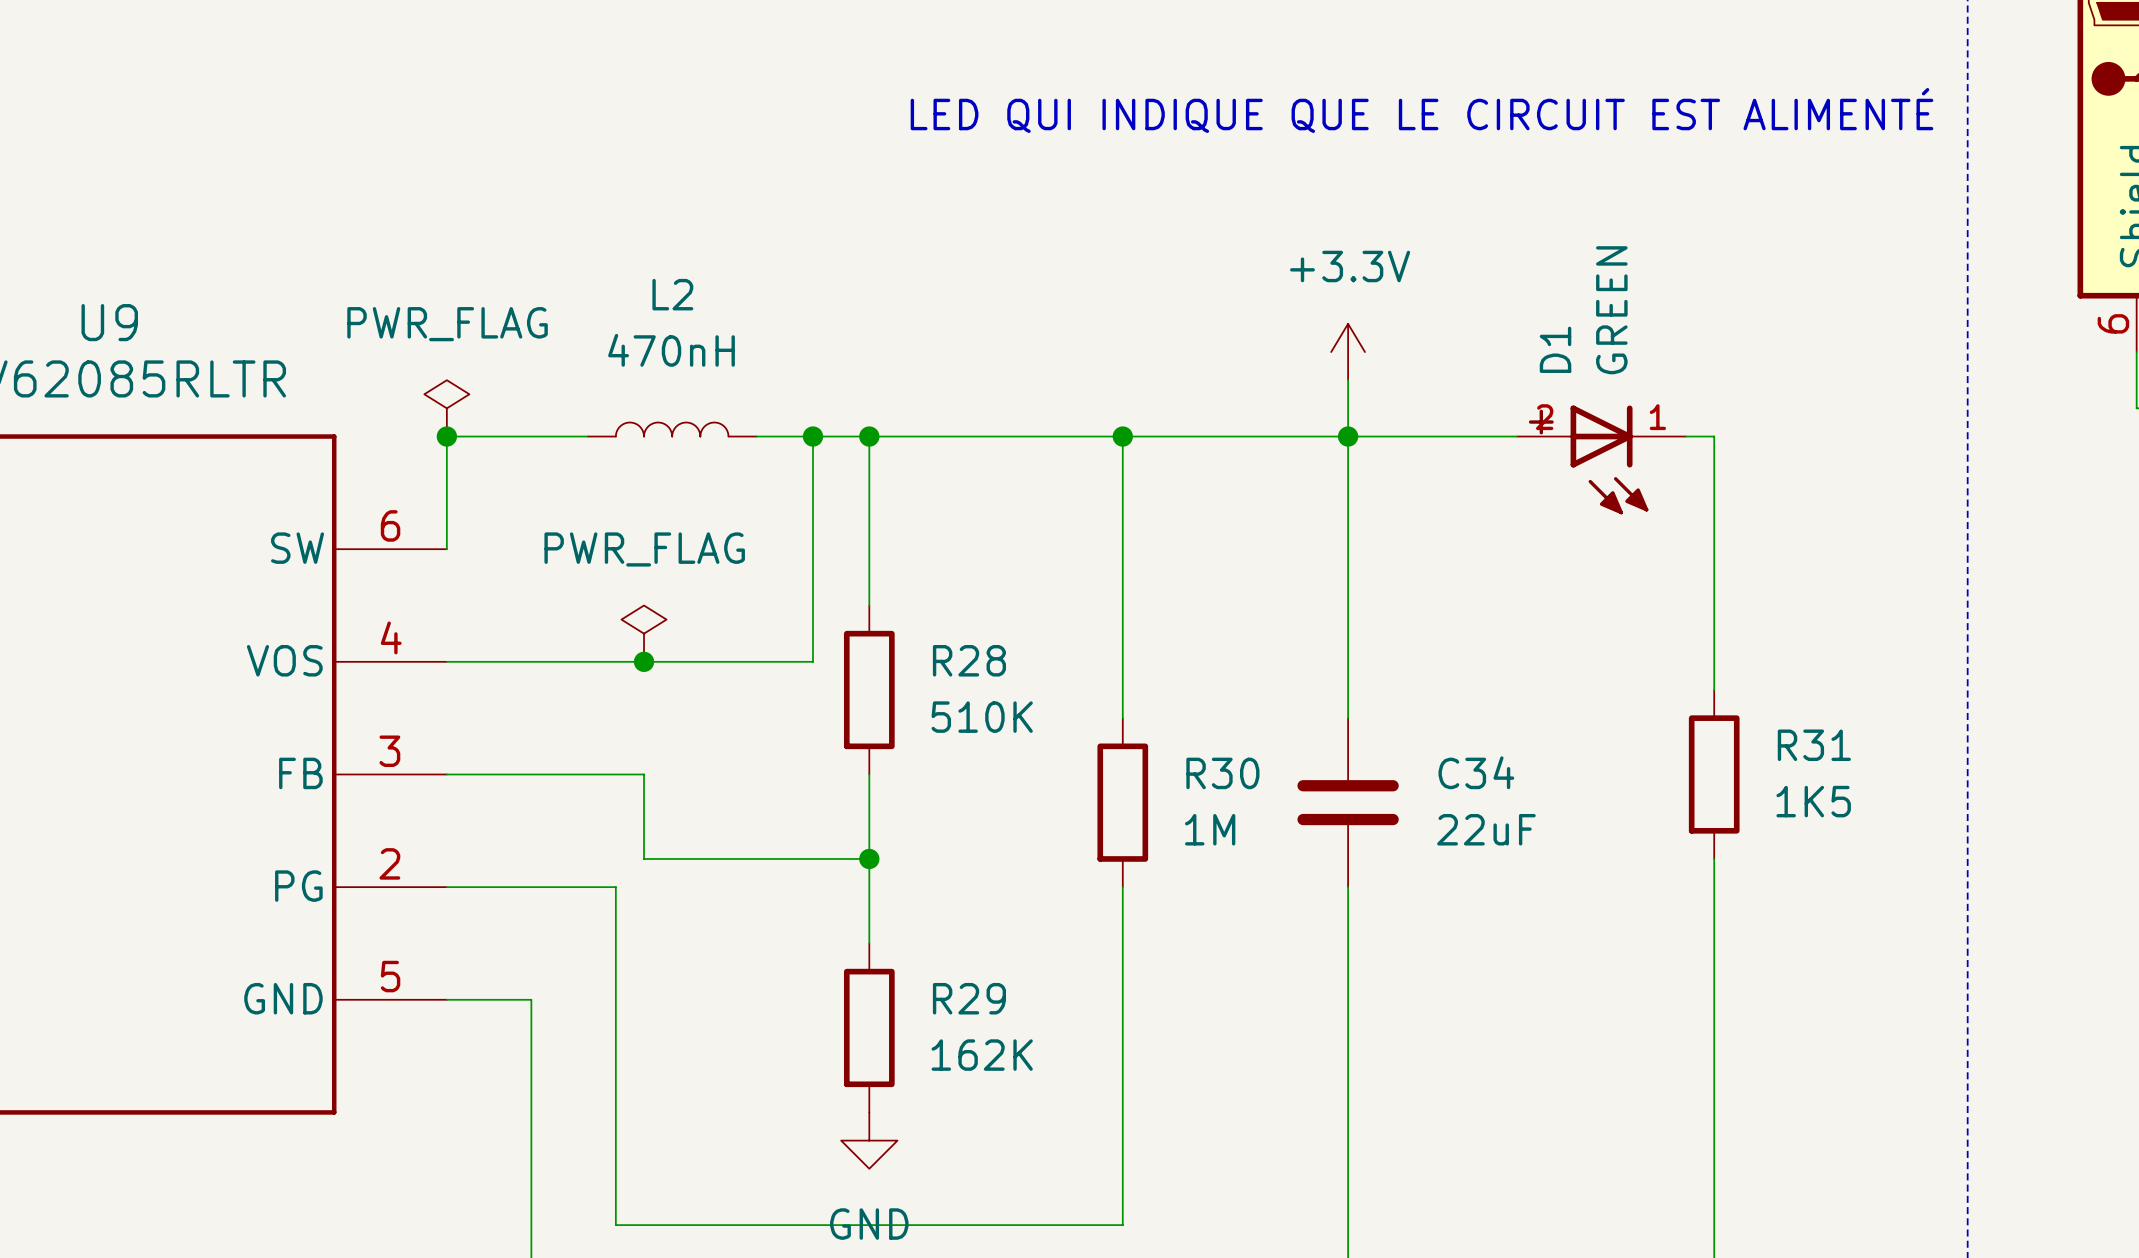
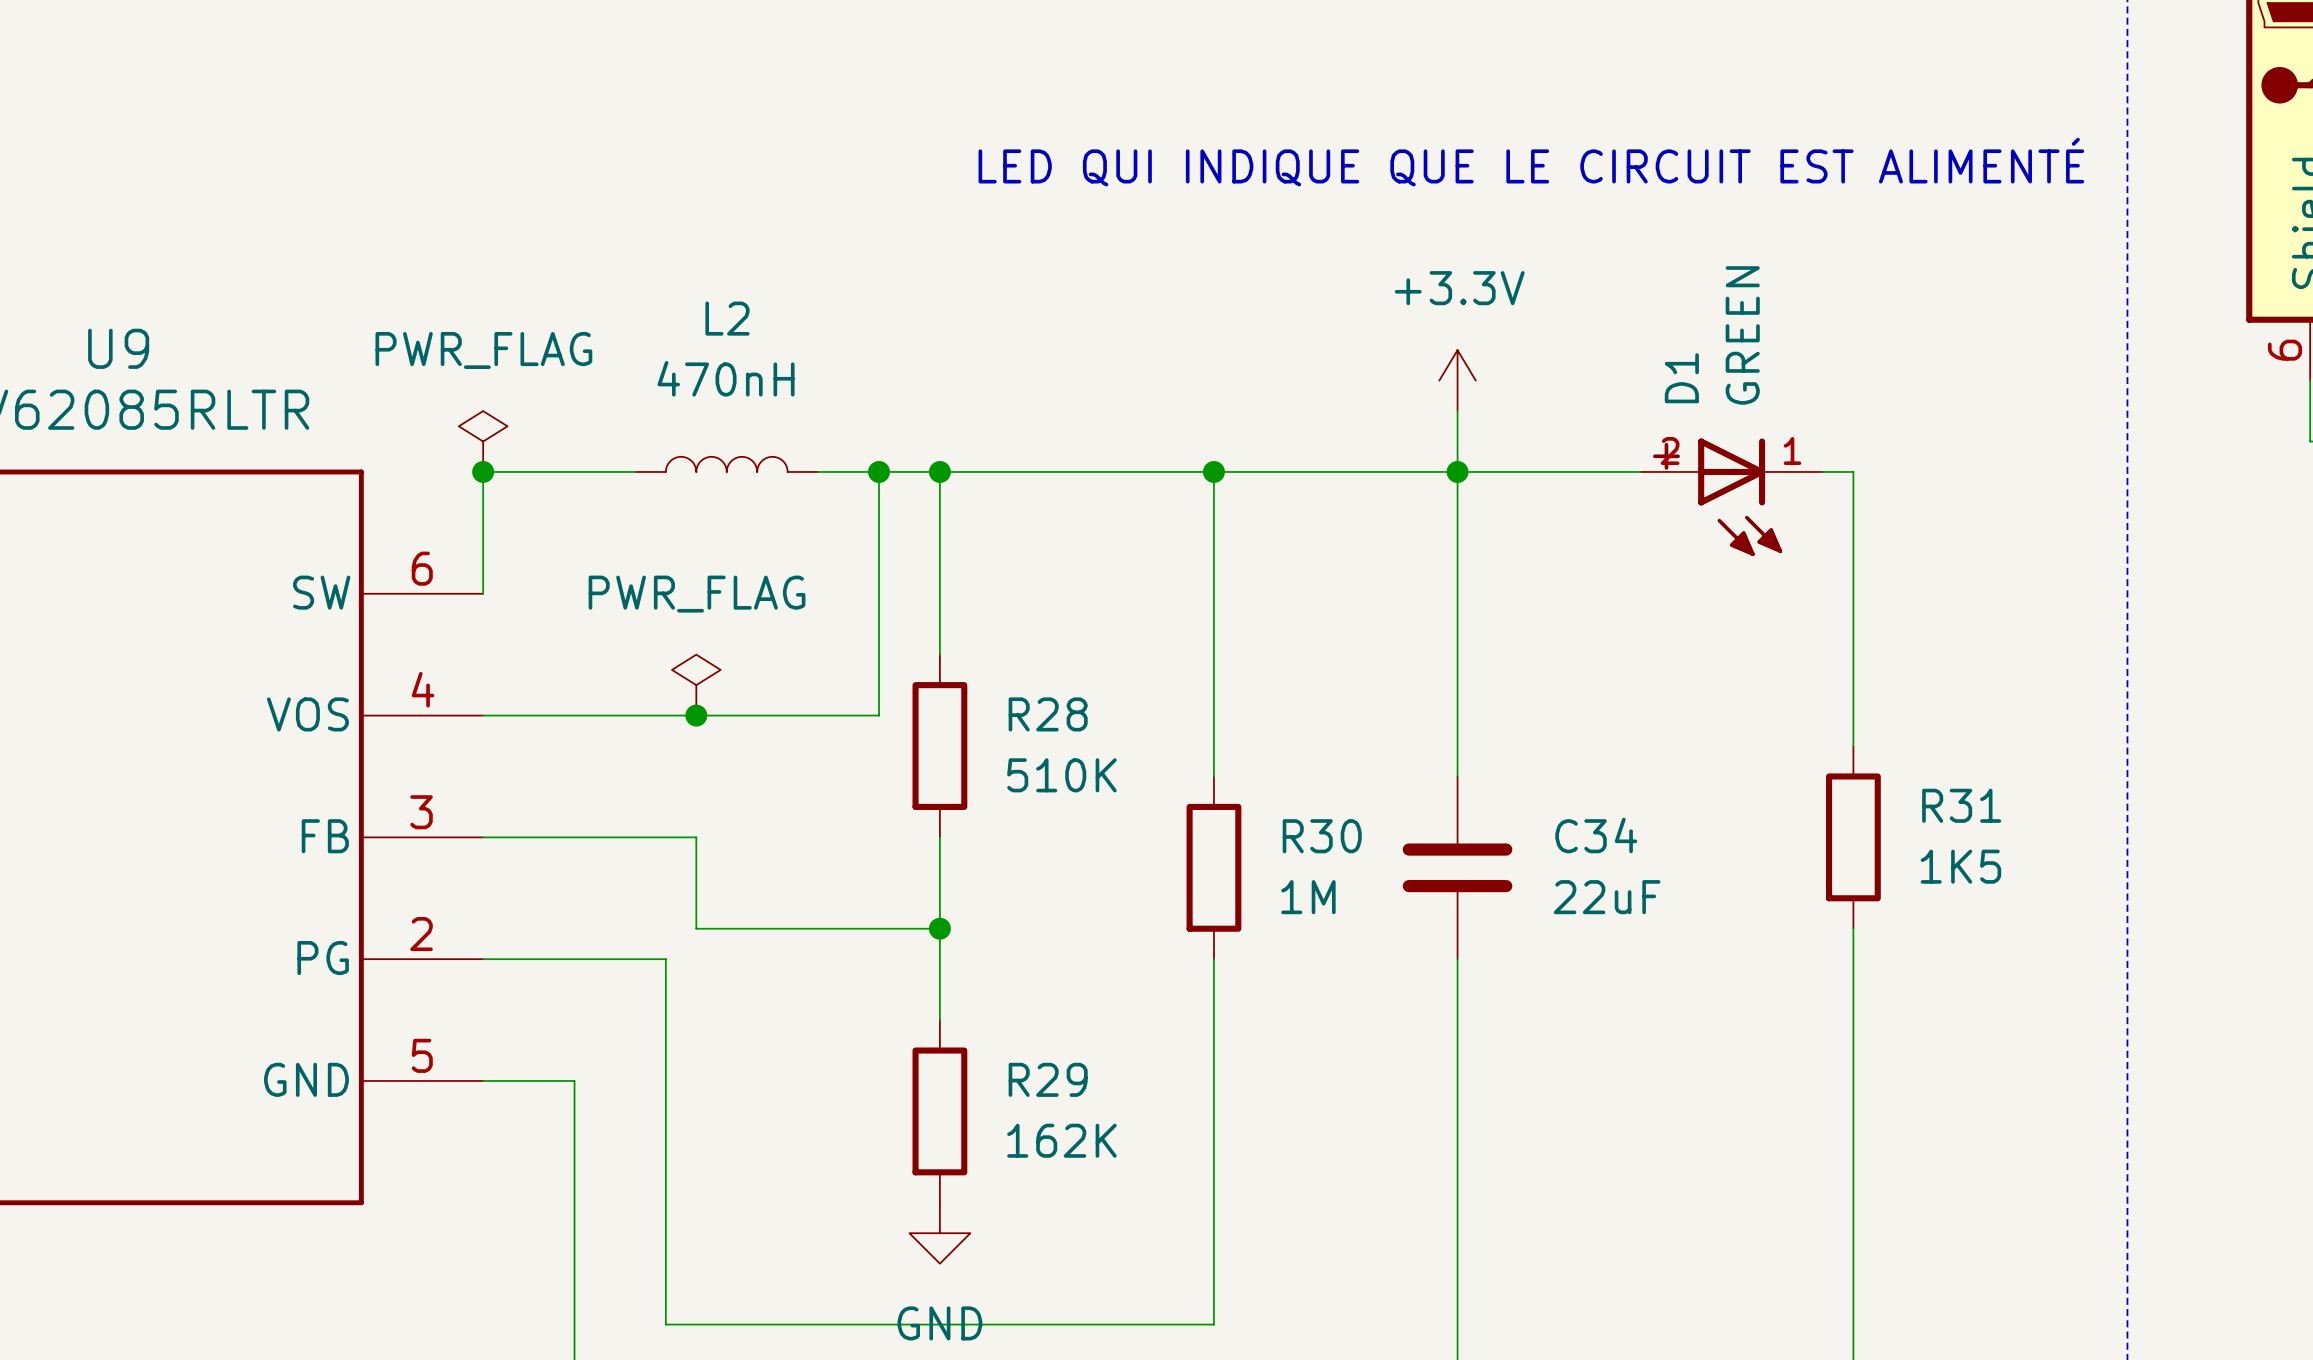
text position: LED QUI INDIQUE QUE LE CIRCUIT EST ALIMENTÉ (1421, 110) -> LED QUI INDIQUE QUE LE CIRCUIT EST ALIMENTÉ (1531, 162)

